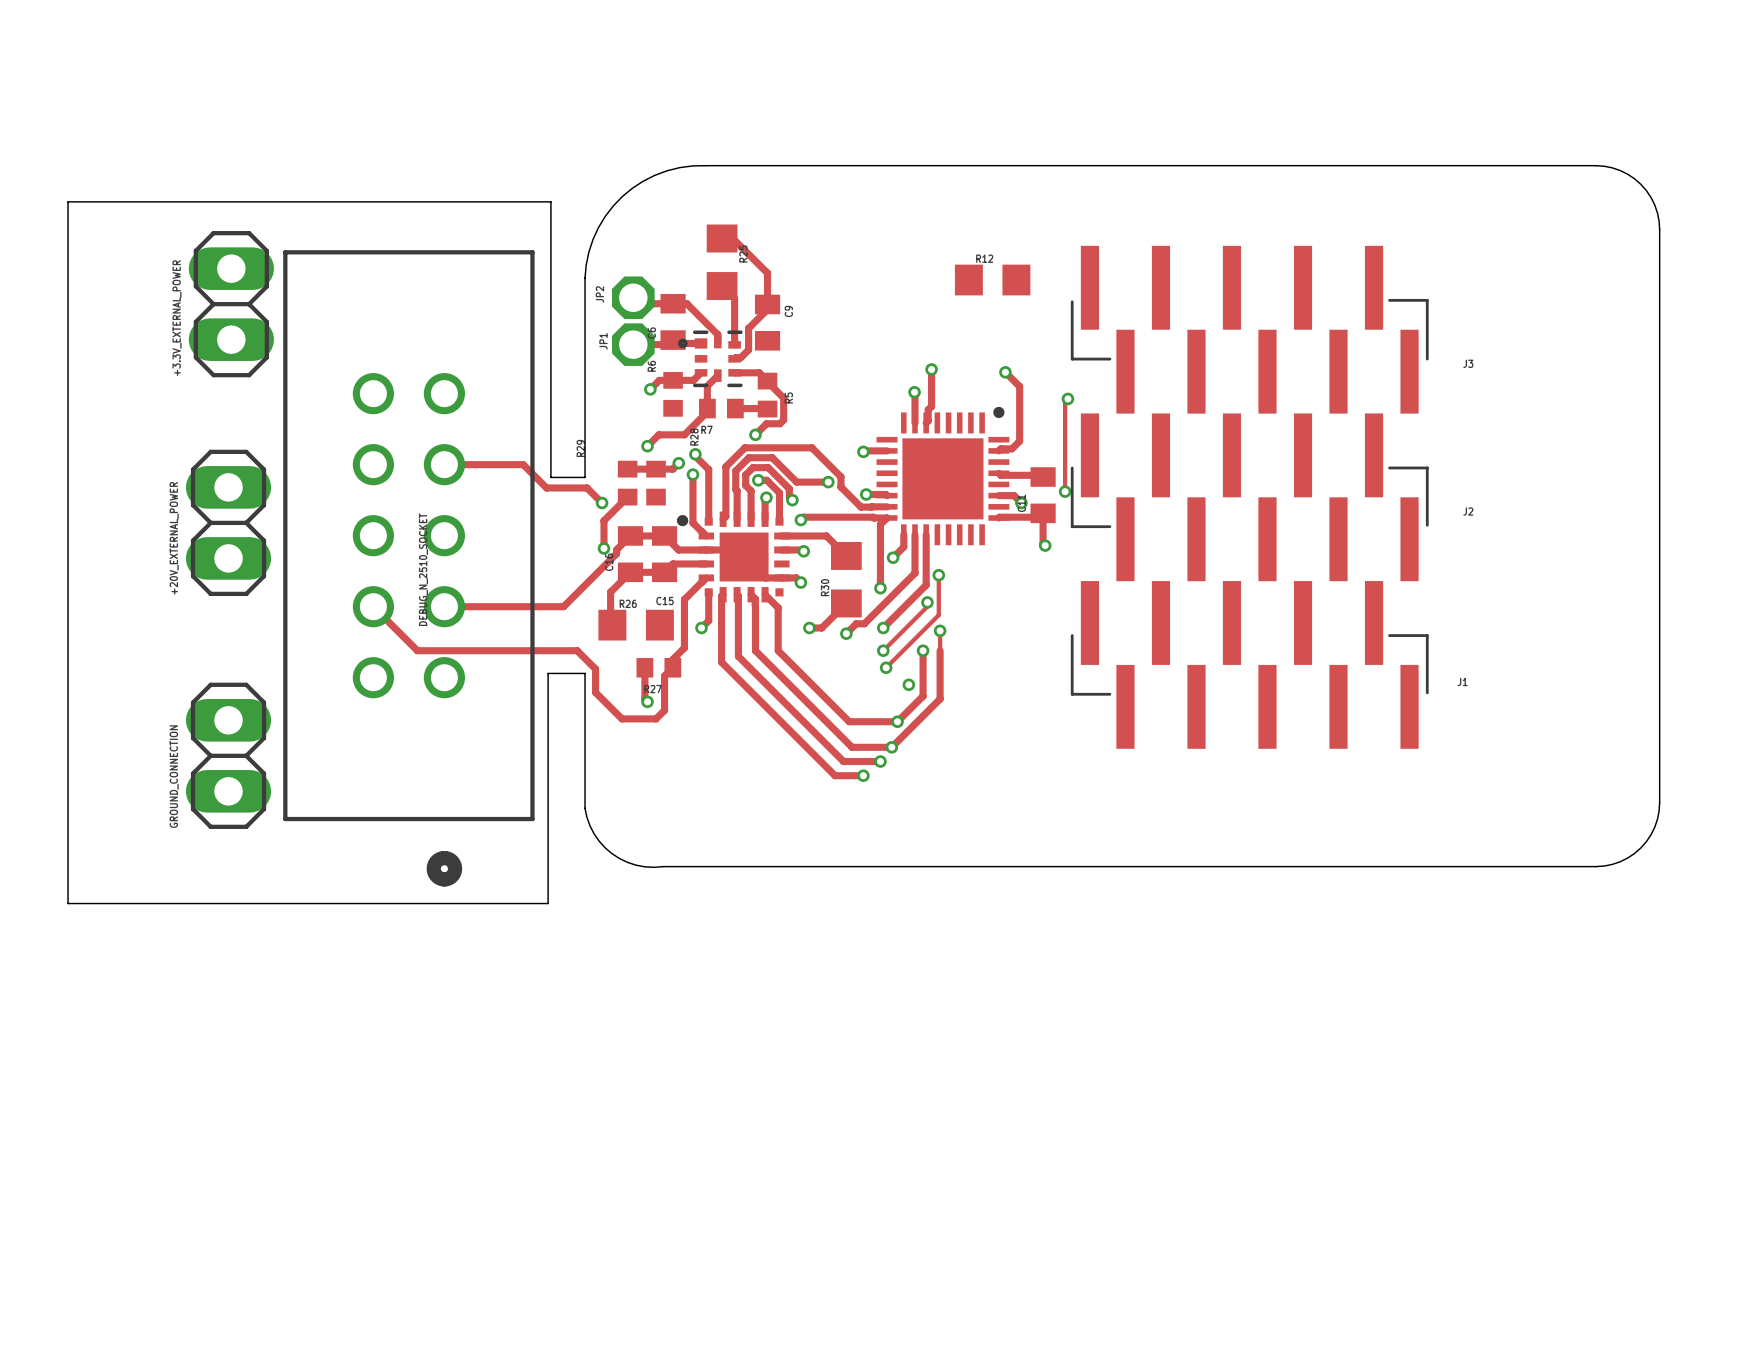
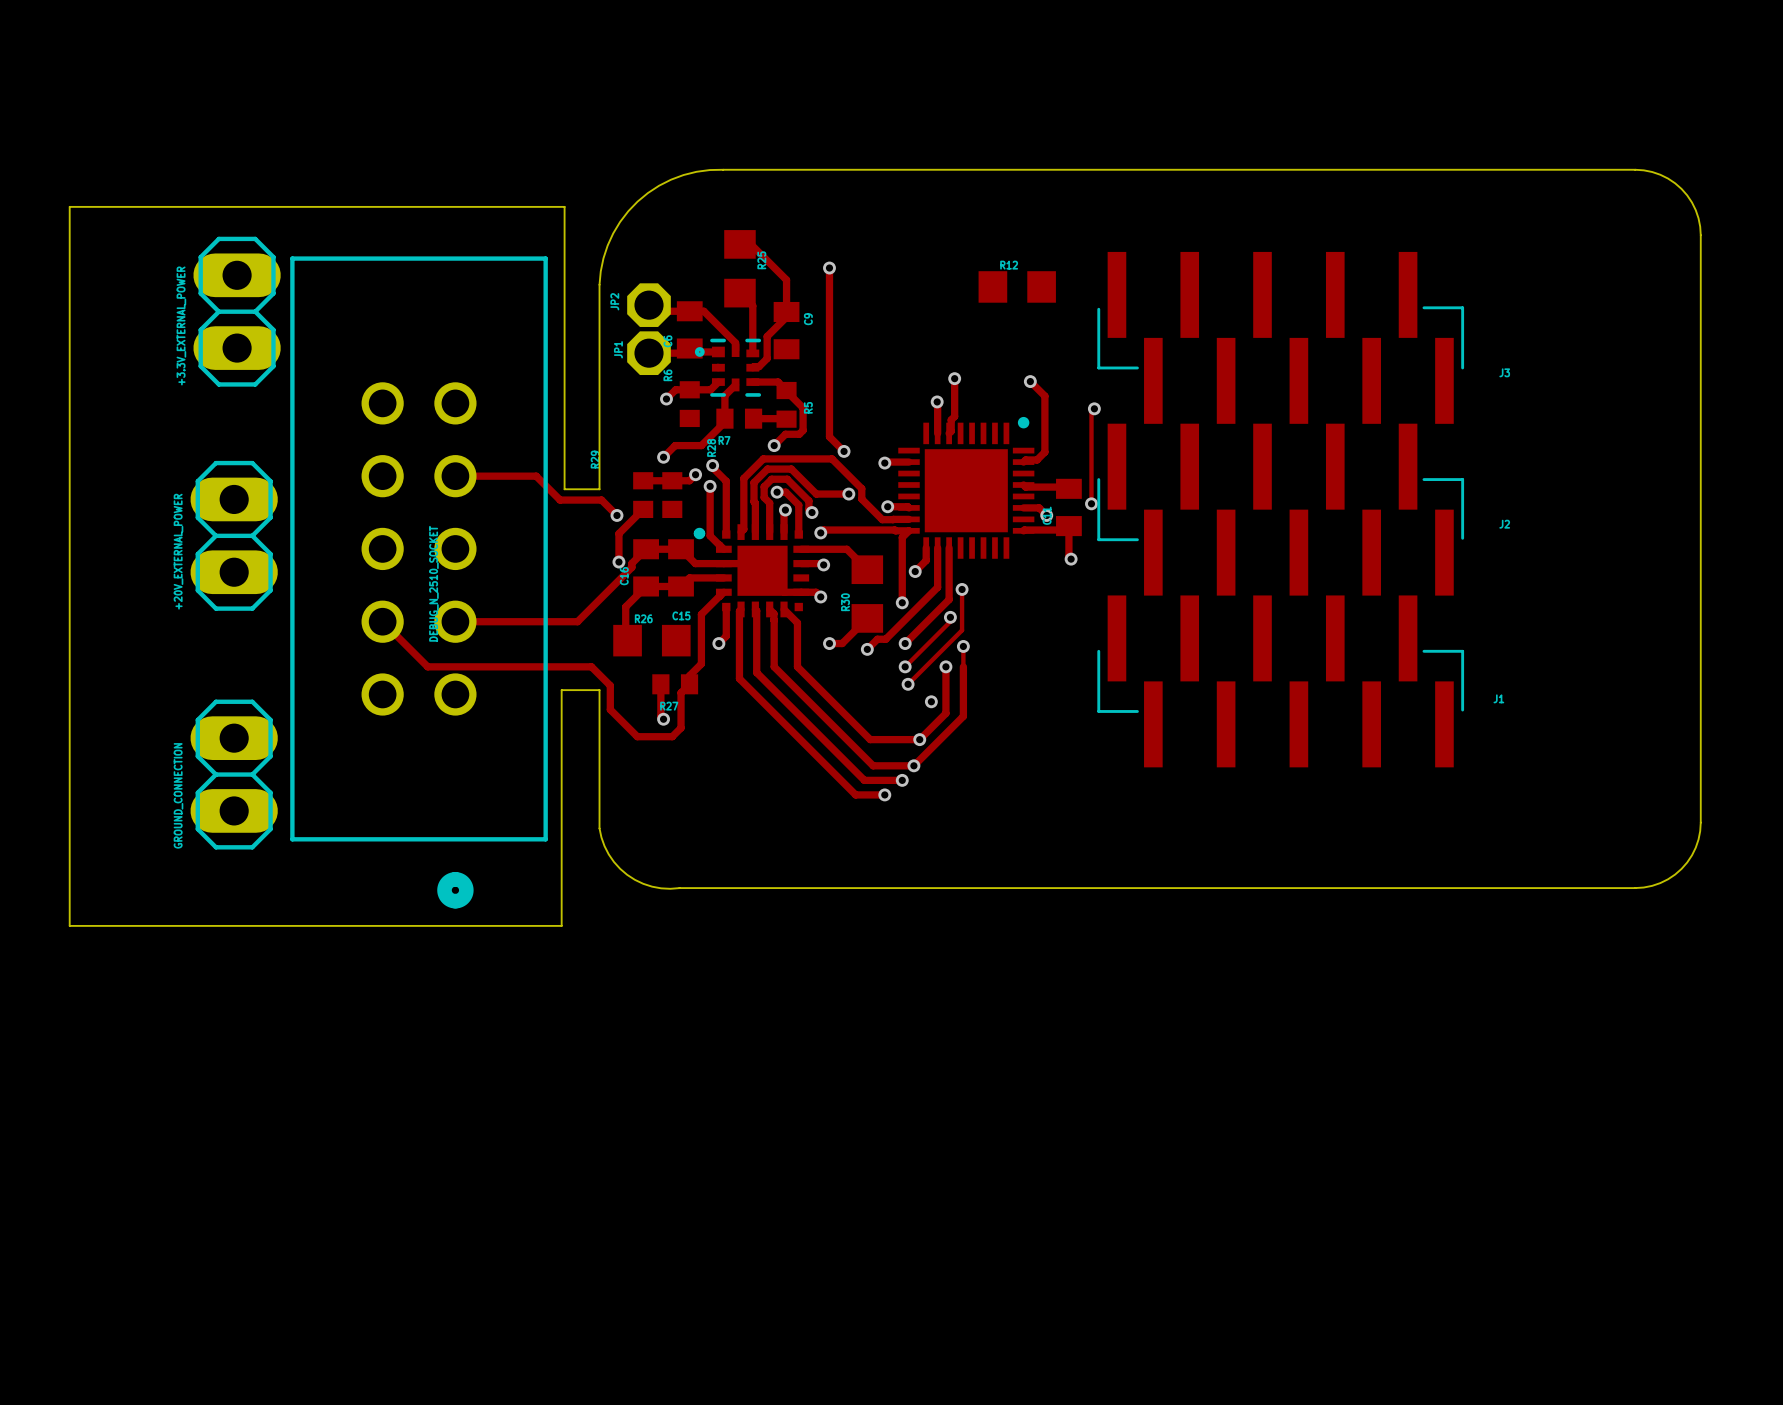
track: none -> (829, 268) (829, 436) (844, 451)
via: none -> (829, 268)
via: none -> (844, 451)

